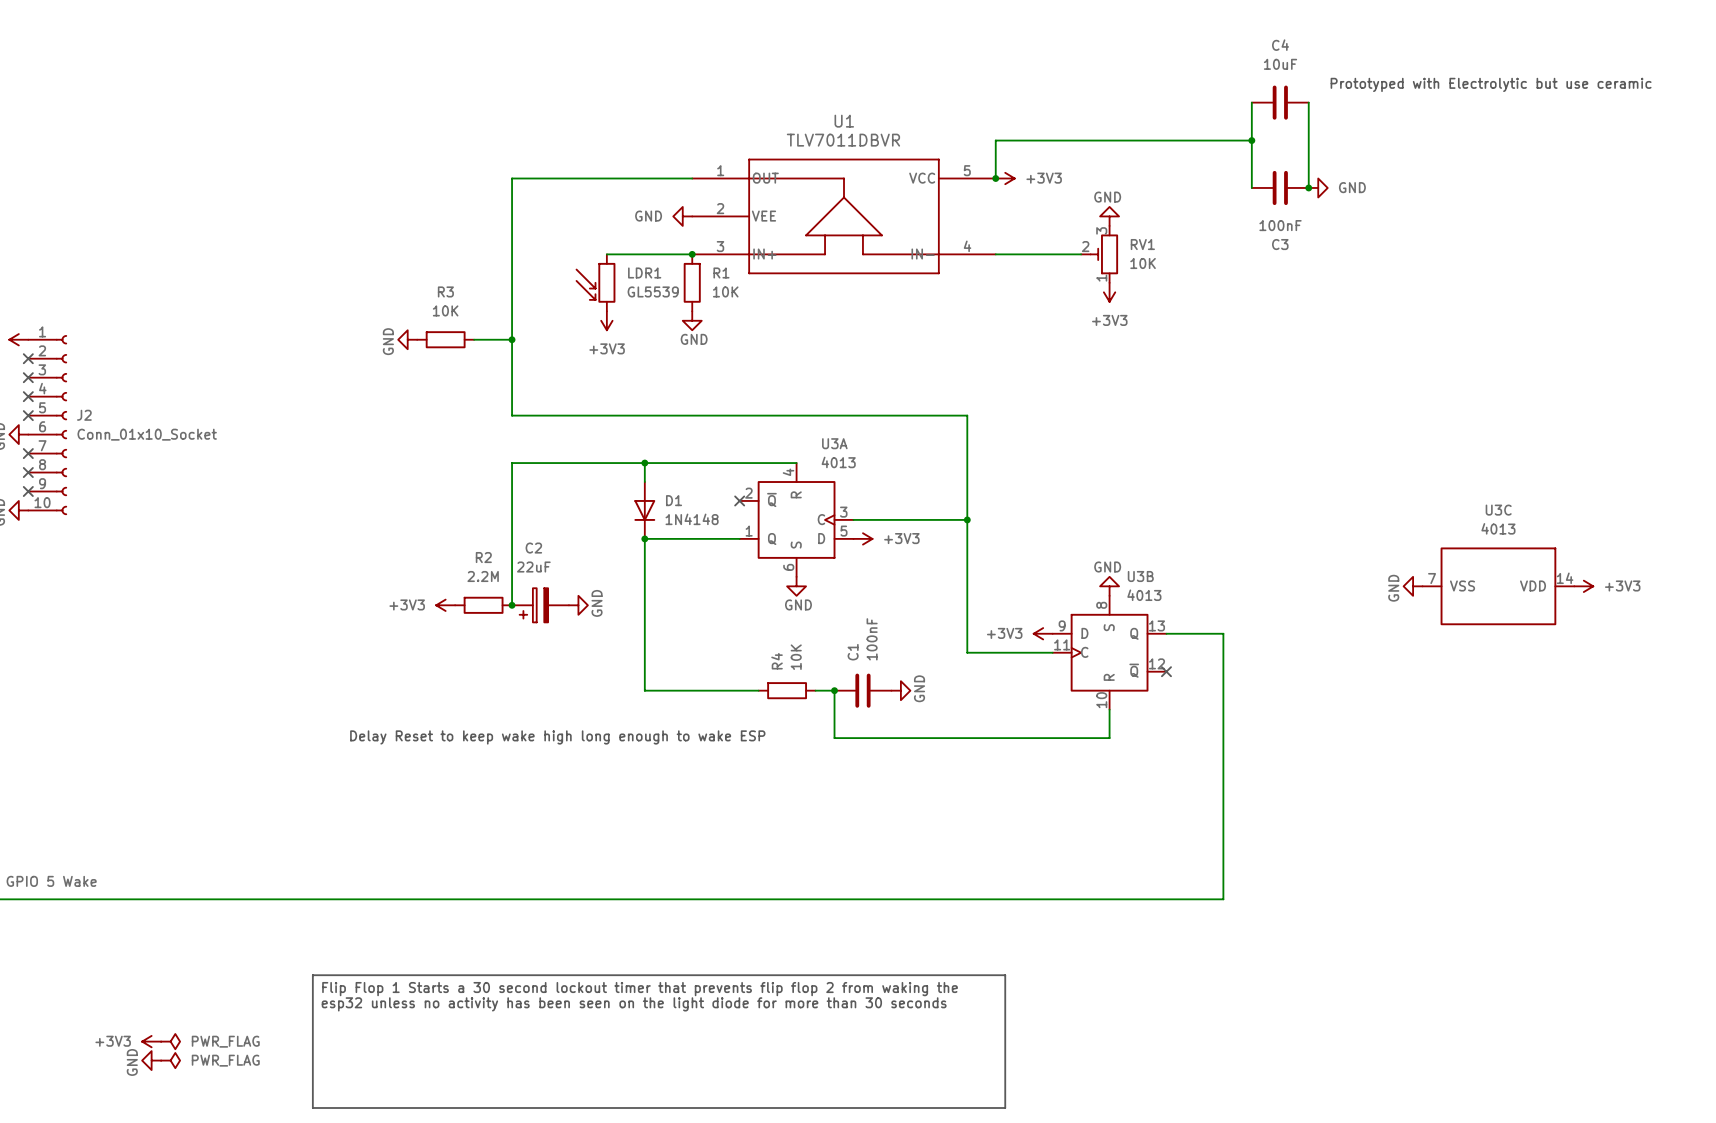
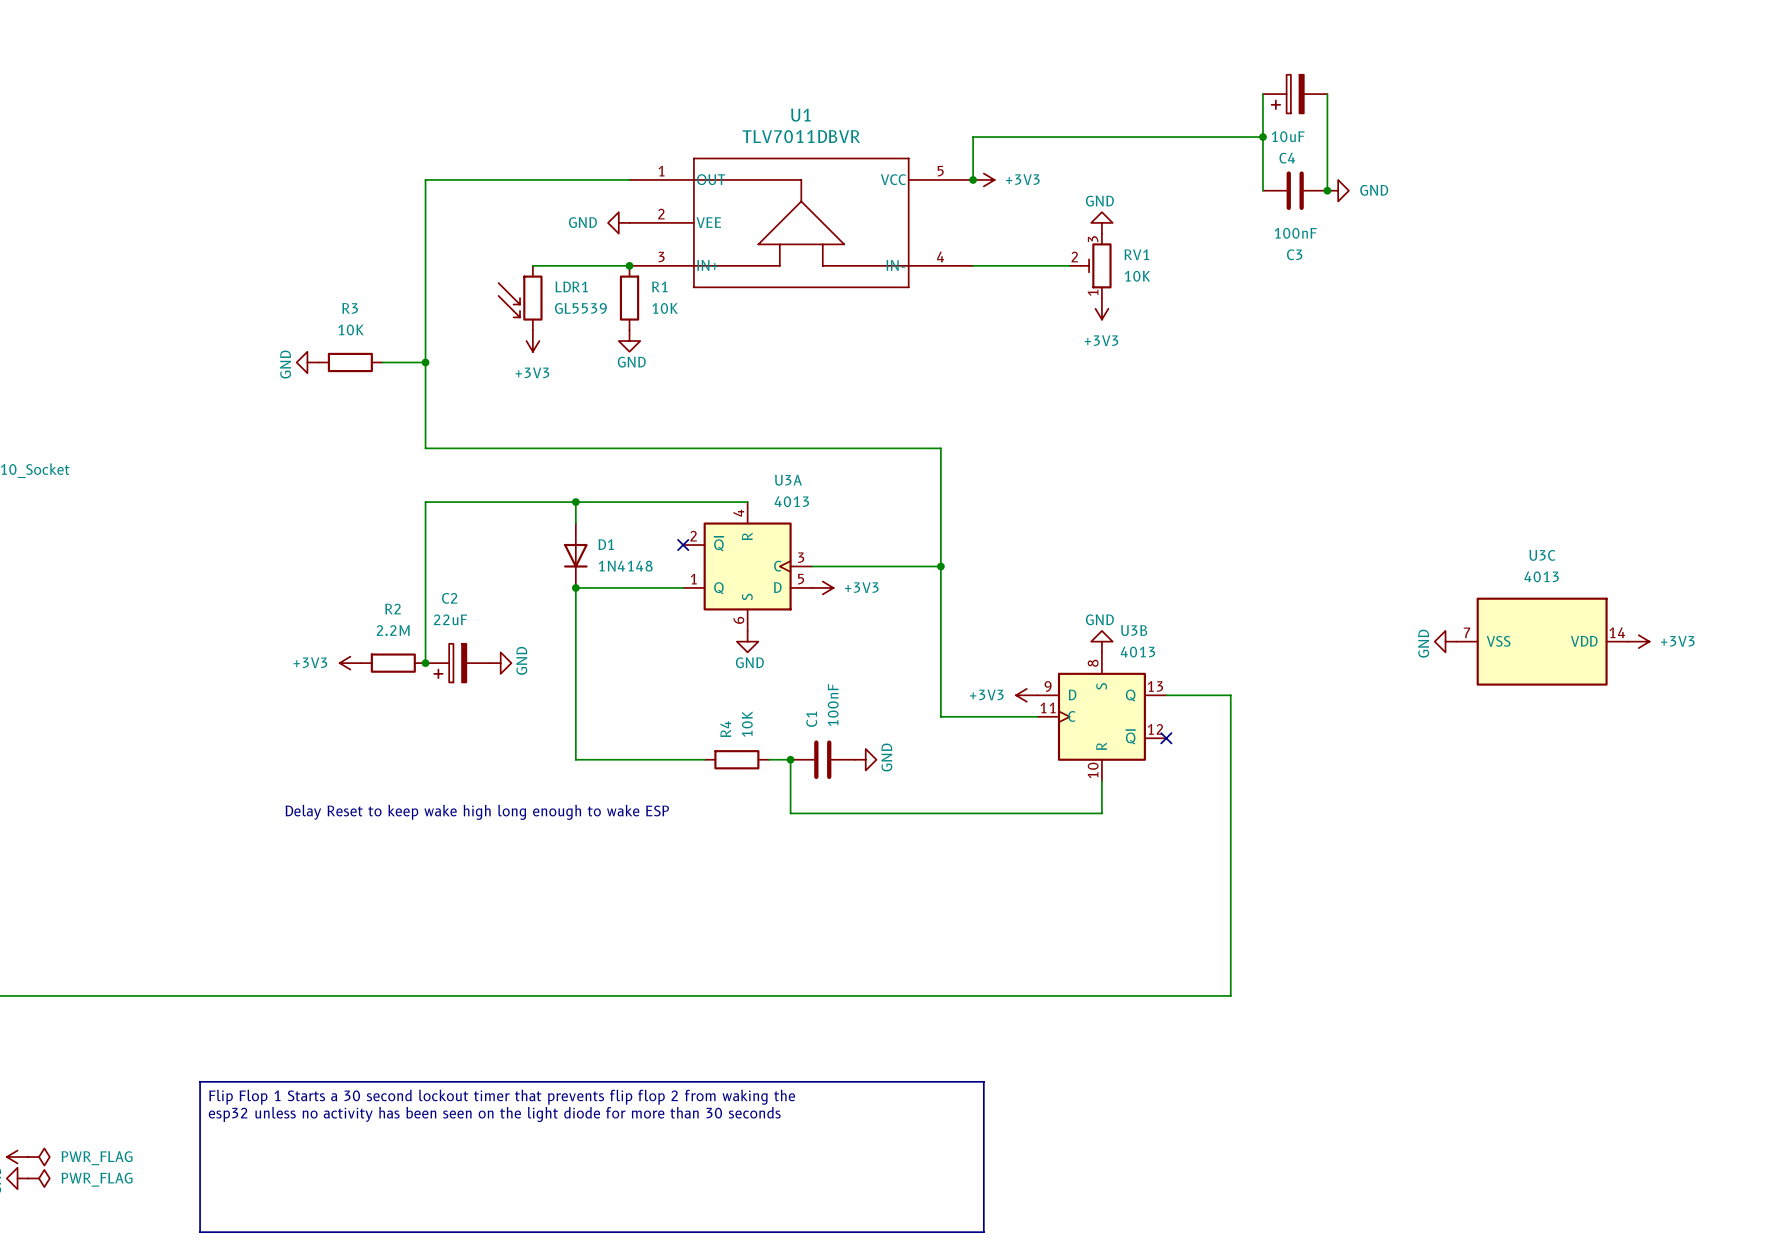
C4 name position: C4 (1280, 45) -> C4 (1287, 158)
C4 value position: 10uF (1280, 64) -> 10uF (1288, 136)
text: Prototyped with Electrolytic but use ceramic (1491, 84) -> none
C4 symbol: [1251, 85, 1309, 120] -> [1262, 74, 1328, 114]

